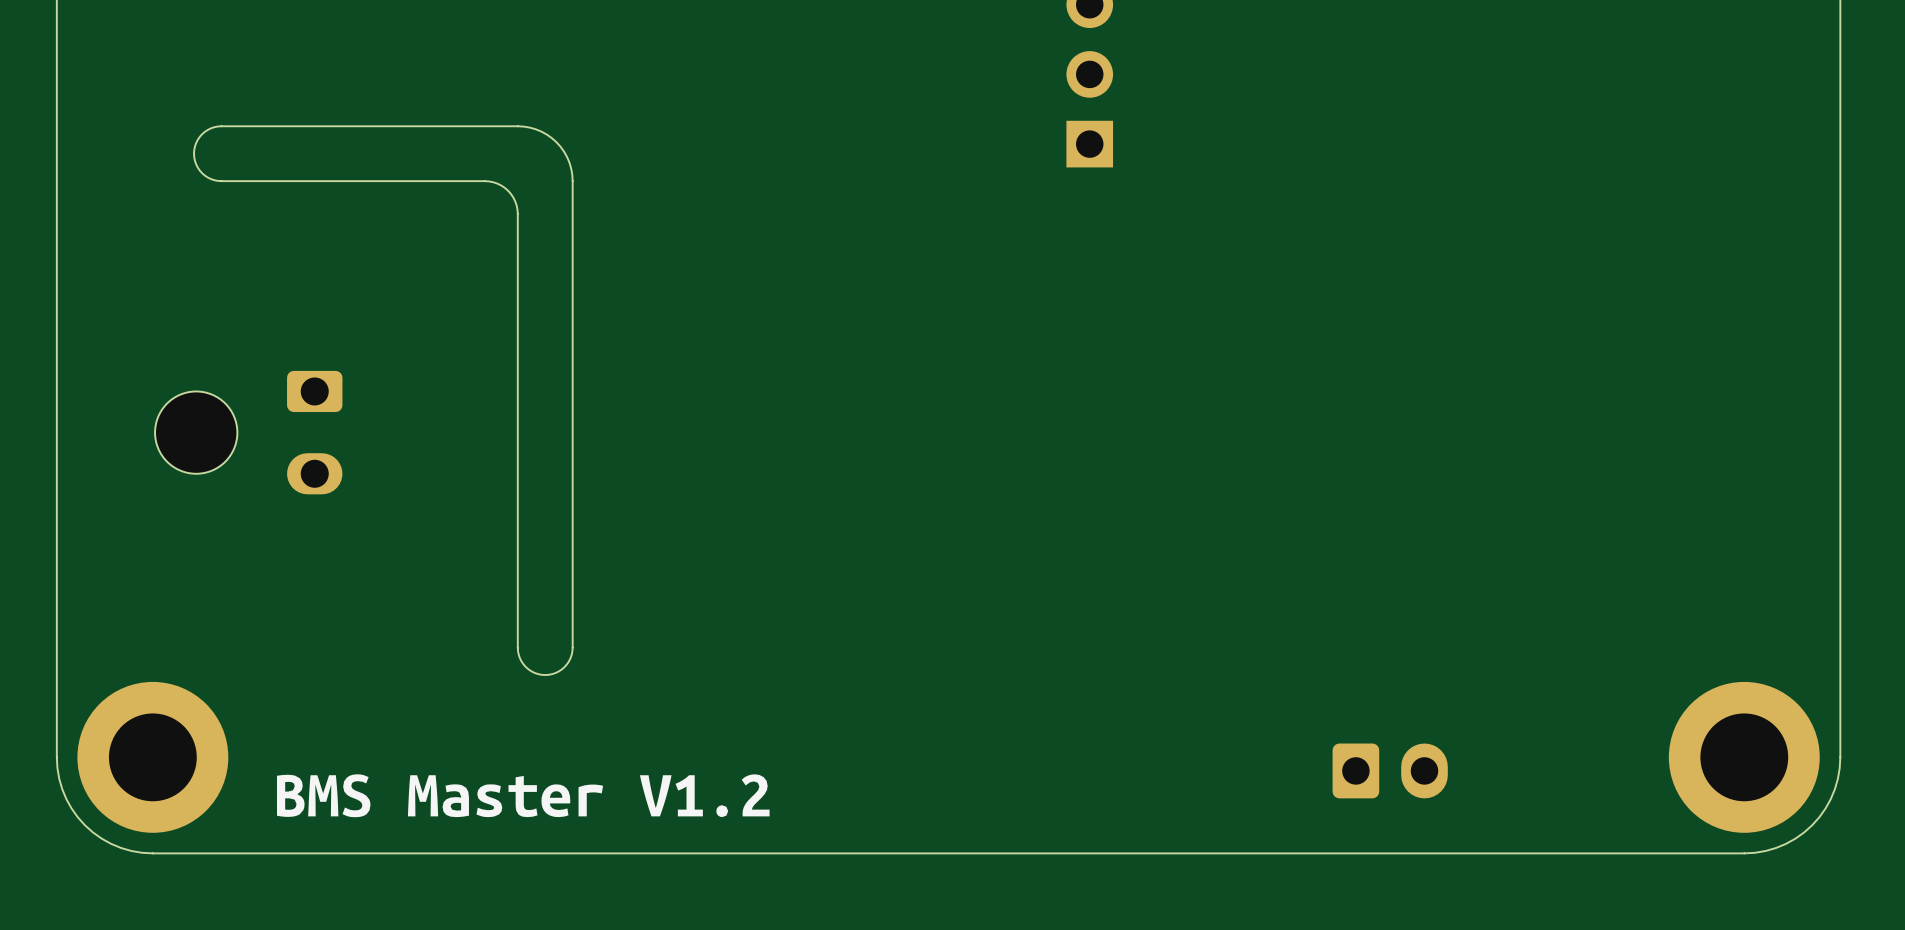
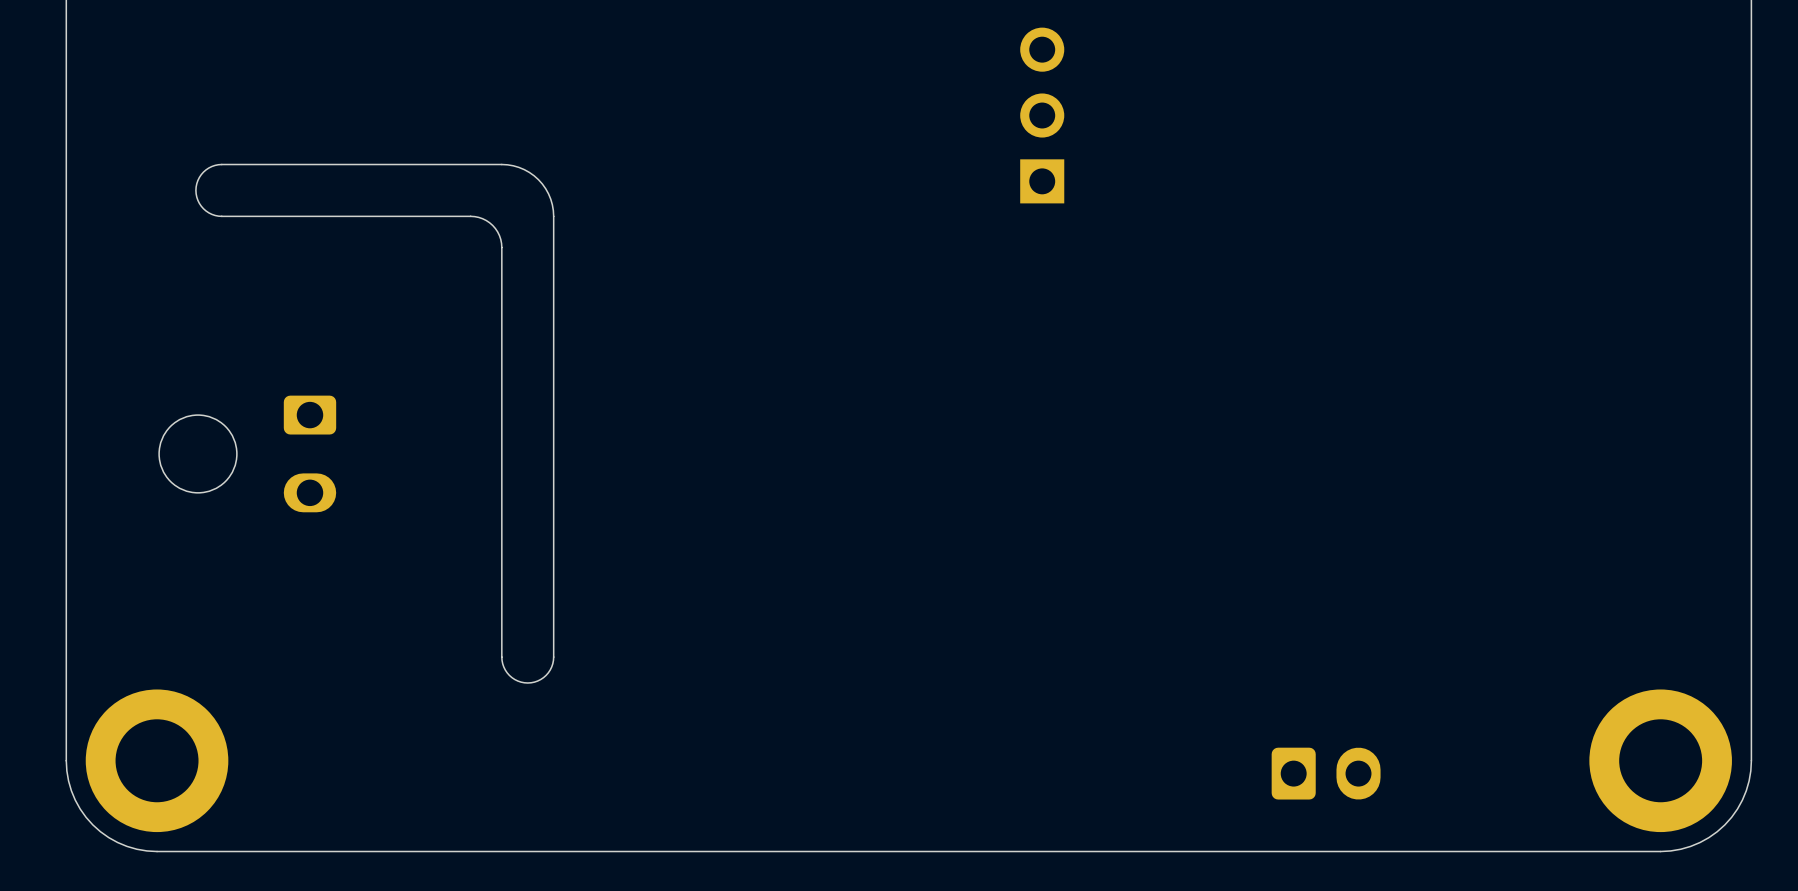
drawing: [276, 774, 770, 818] -> none

